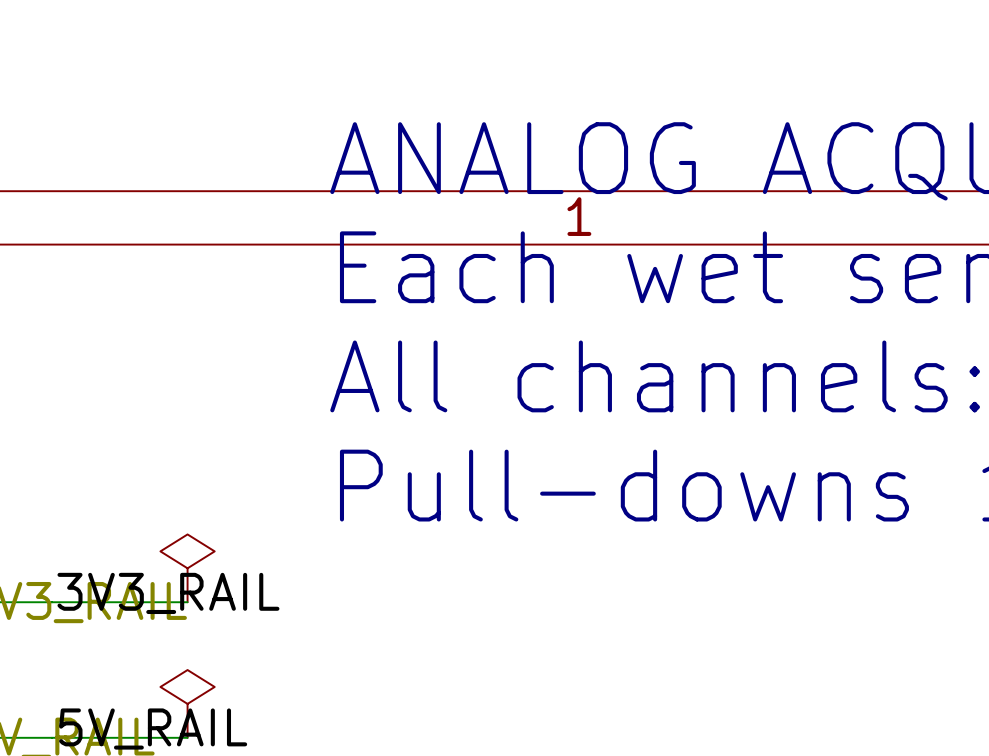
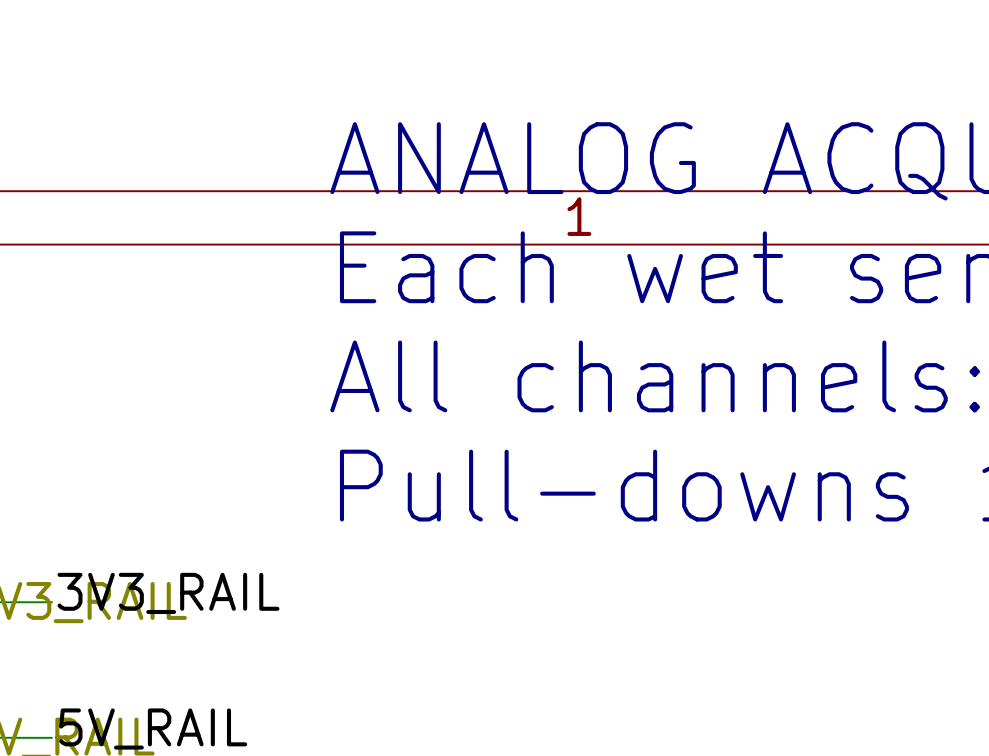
power symbol: (187, 568) -> none
wire: (51, 602) (187, 602) -> none
power symbol: (187, 703) -> none
wire: (51, 737) (187, 737) -> none

